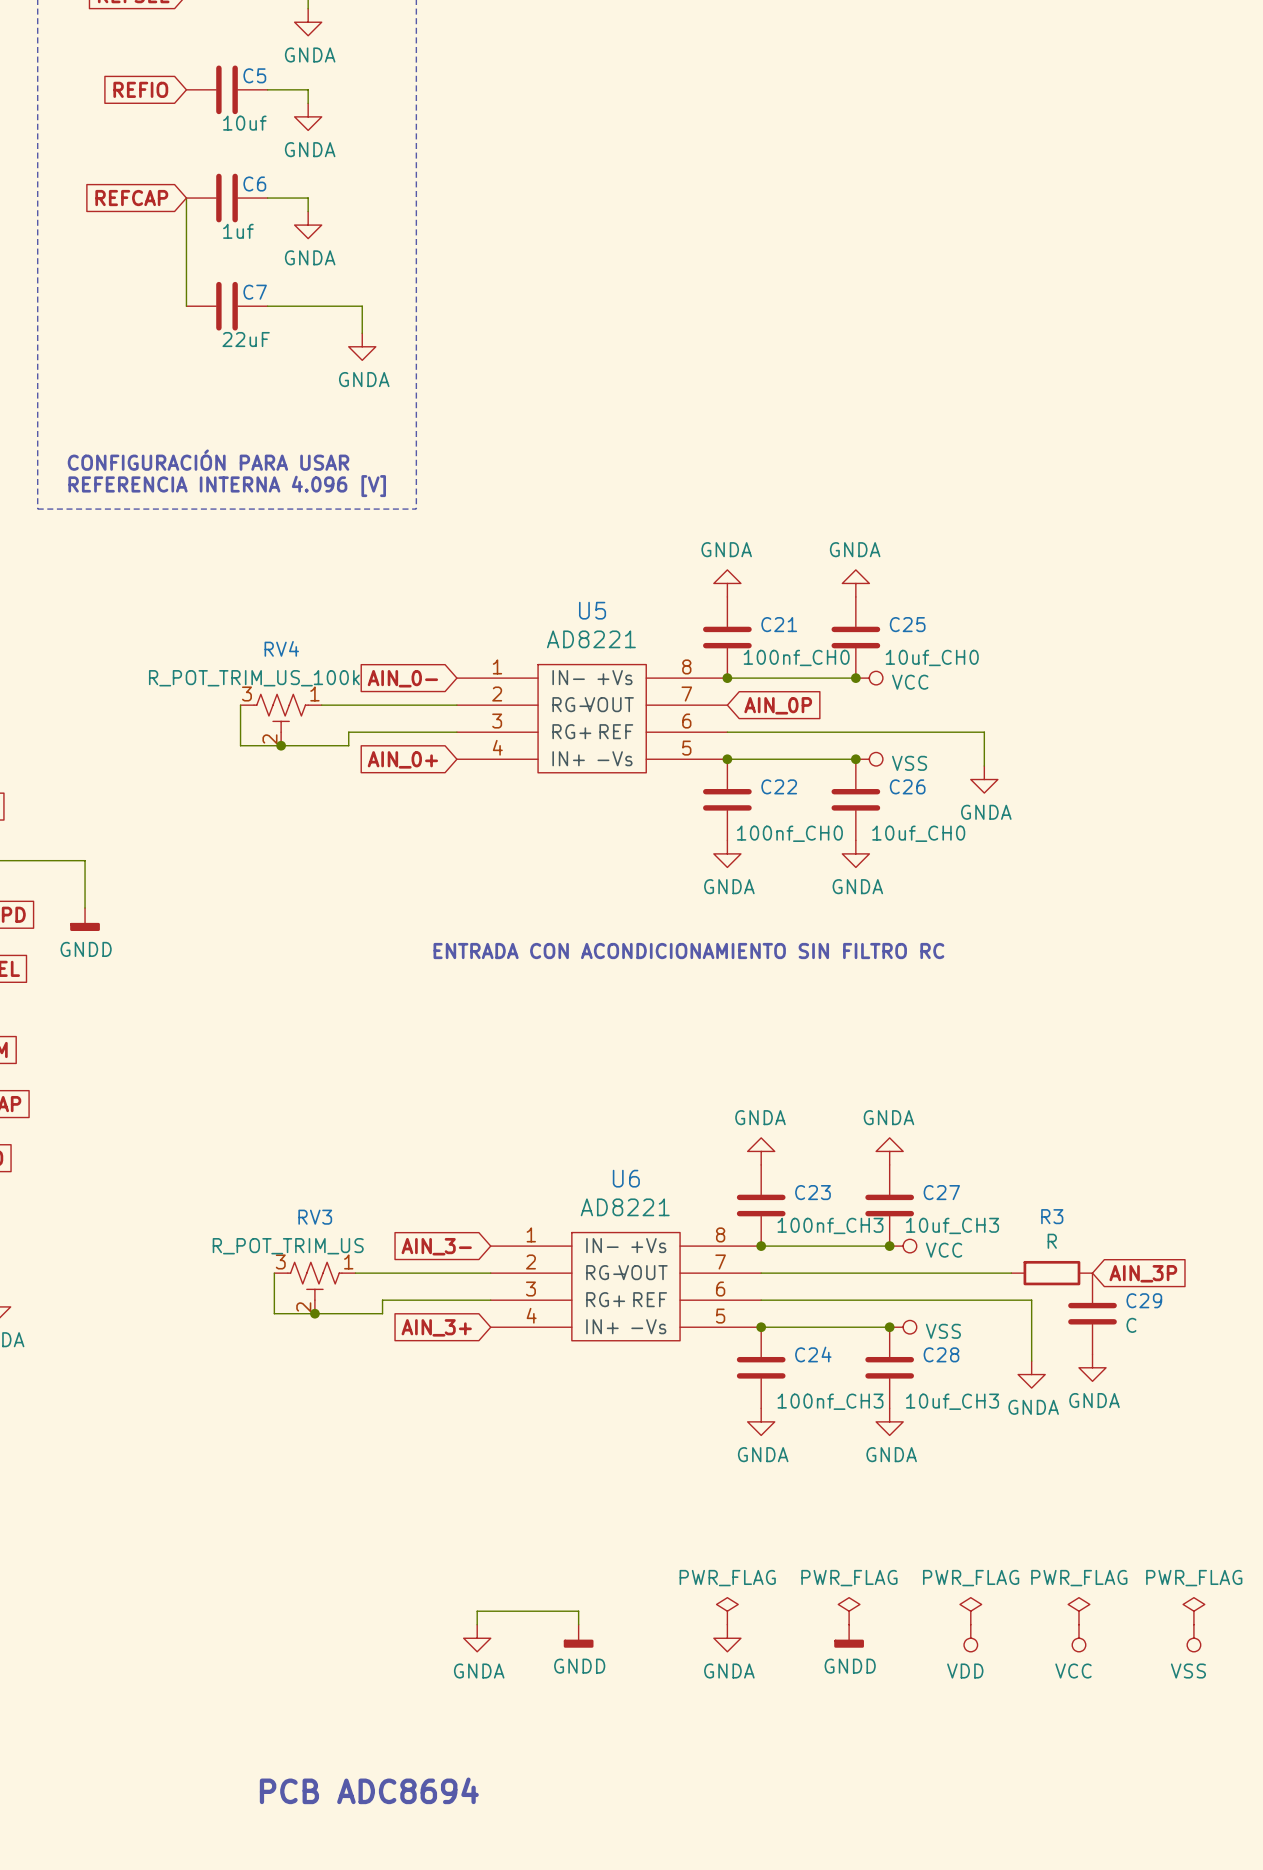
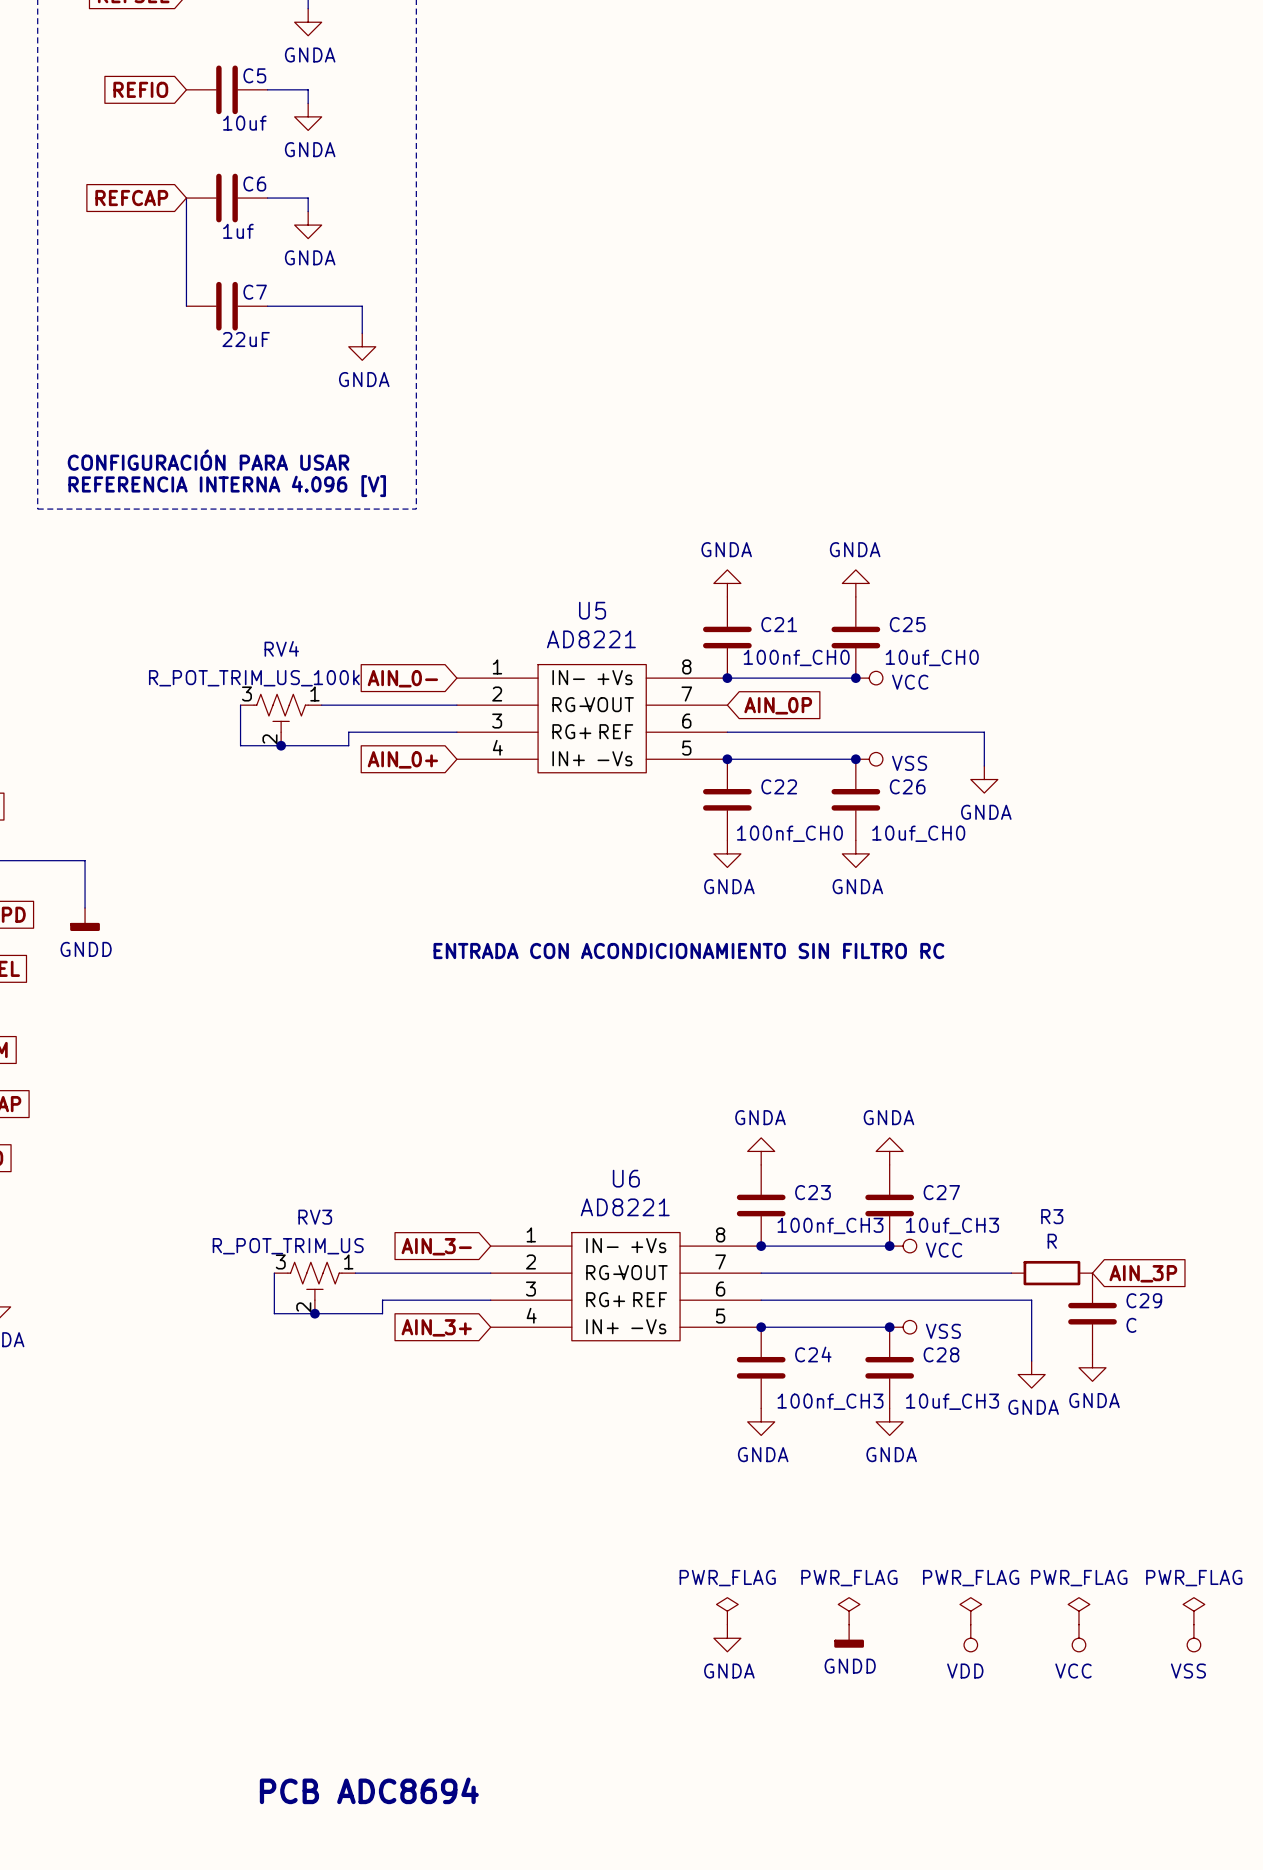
wire: (477, 1624) (477, 1611) (578, 1611) (578, 1624) -> none
power symbol: GNDD (578, 1636) -> none
power symbol: GNDA (477, 1638) -> none

